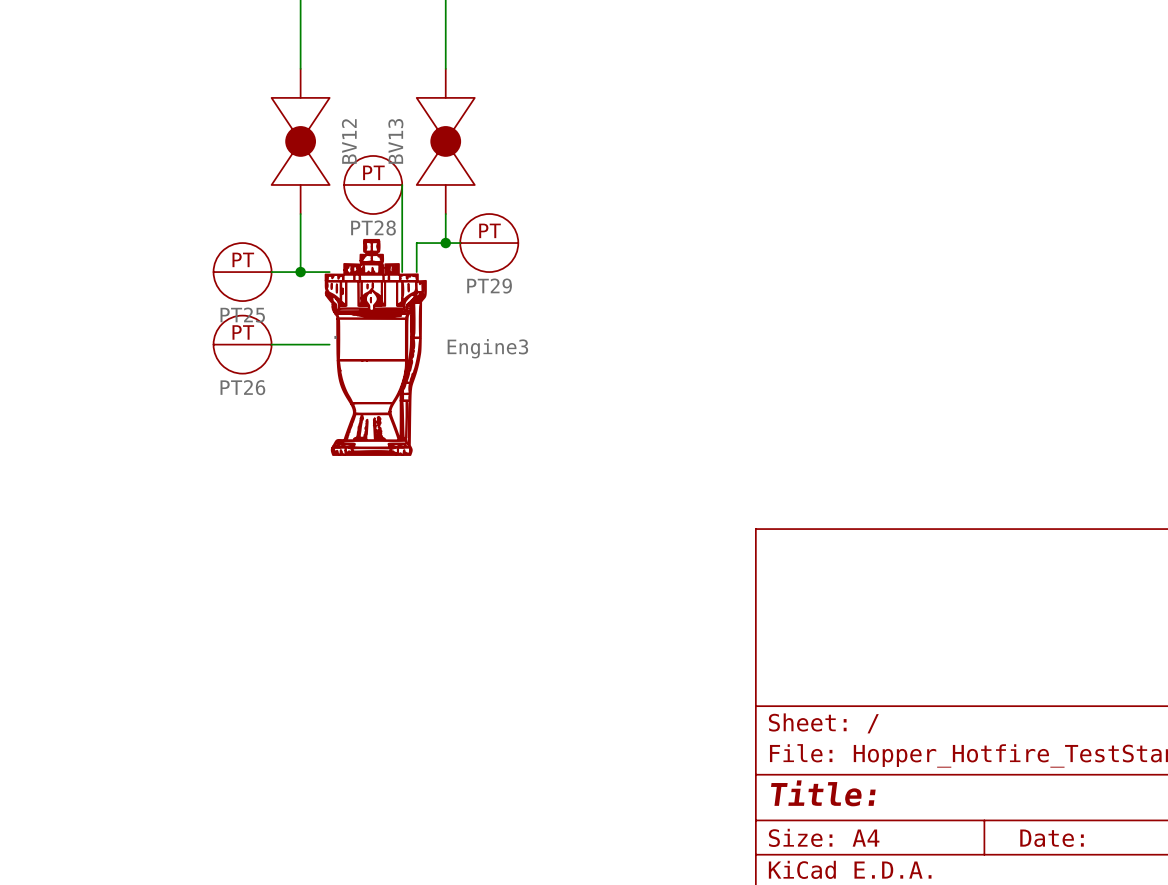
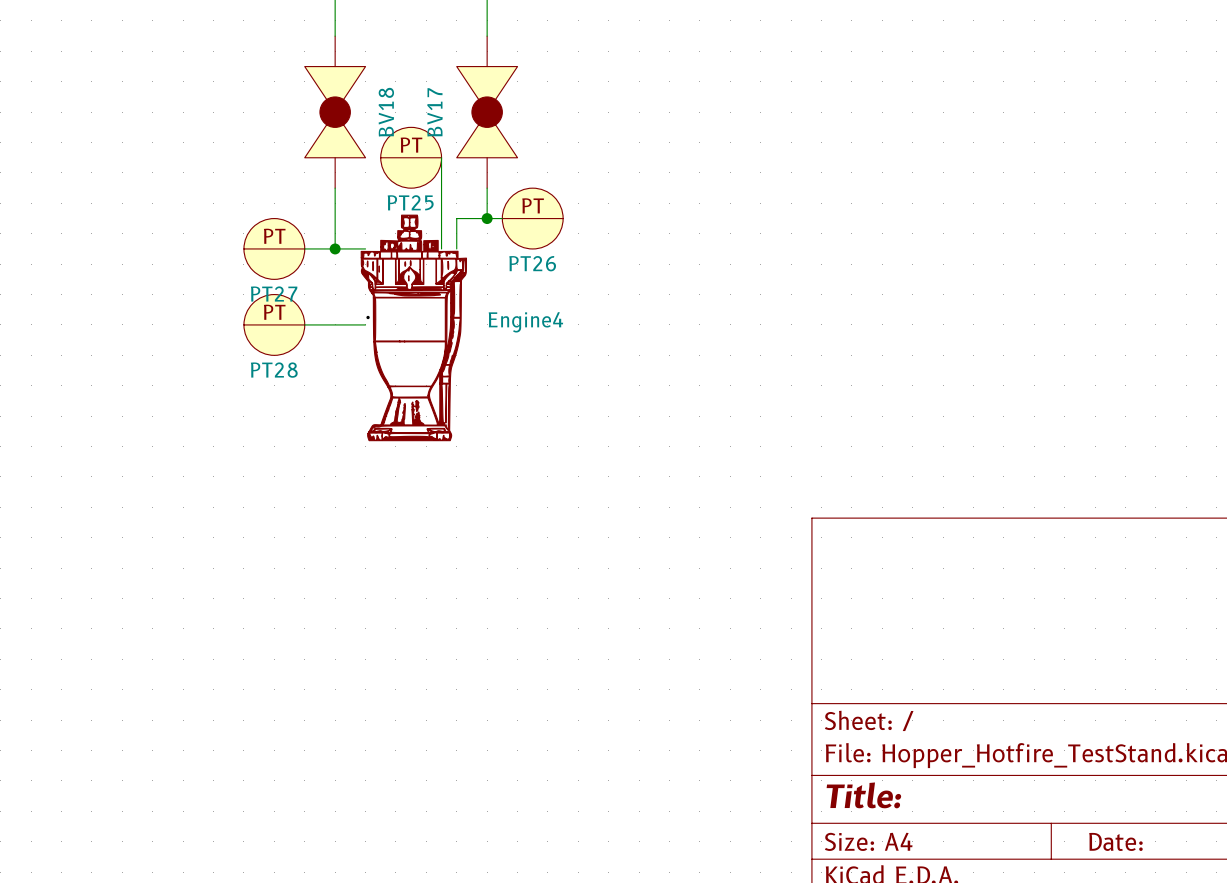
BV12 name: BV12 (349, 141) -> BV18 (386, 112)
BV13 name: BV13 (395, 141) -> BV17 (434, 112)
PT28 name: PT28 (373, 227) -> PT25 (410, 202)
PT29 name: PT29 (489, 286) -> PT26 (532, 263)
PT25 name: PT25 (242, 315) -> PT27 (274, 294)
Engine3 name: Engine3 (487, 348) -> Engine4 (525, 322)
PT26 name: PT26 (242, 387) -> PT28 (274, 370)

